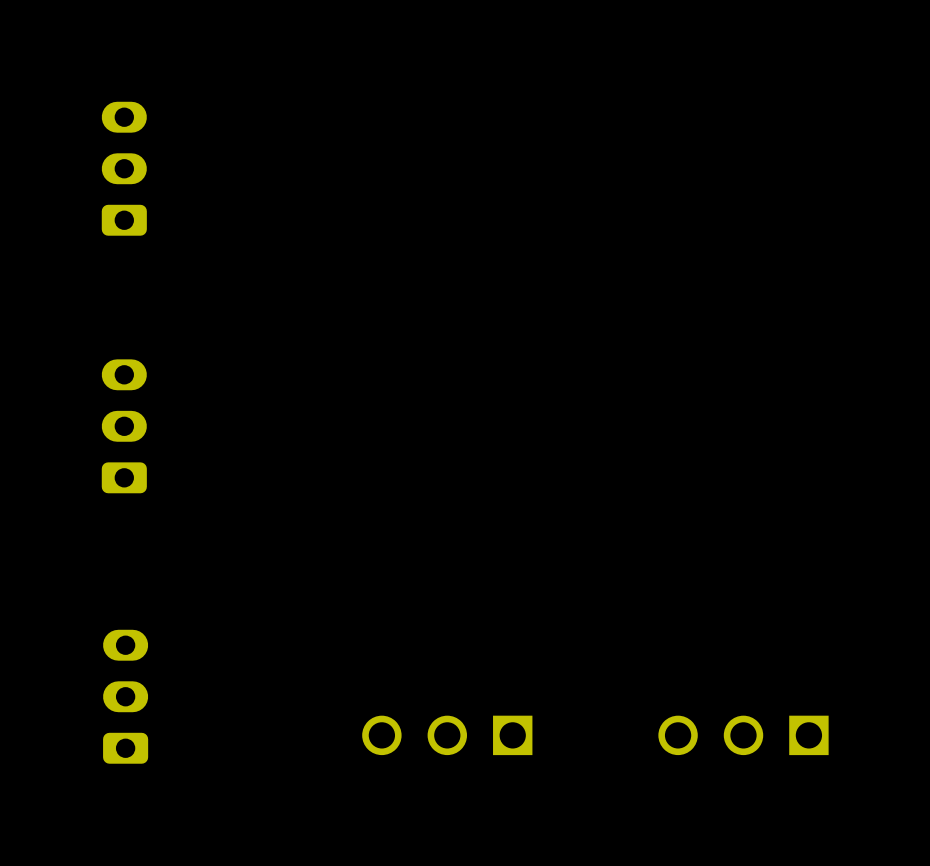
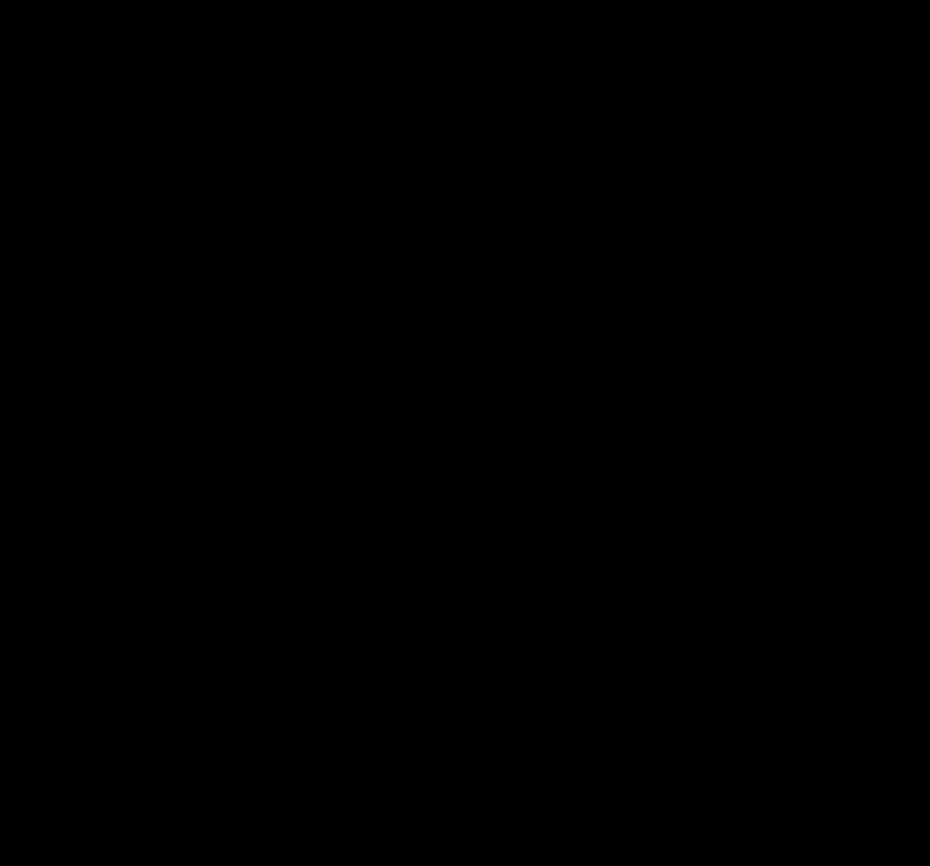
part: (124, 168) -> none
part: (124, 426) -> none
part: (125, 696) -> none
part: (447, 735) -> none
part: (743, 735) -> none

